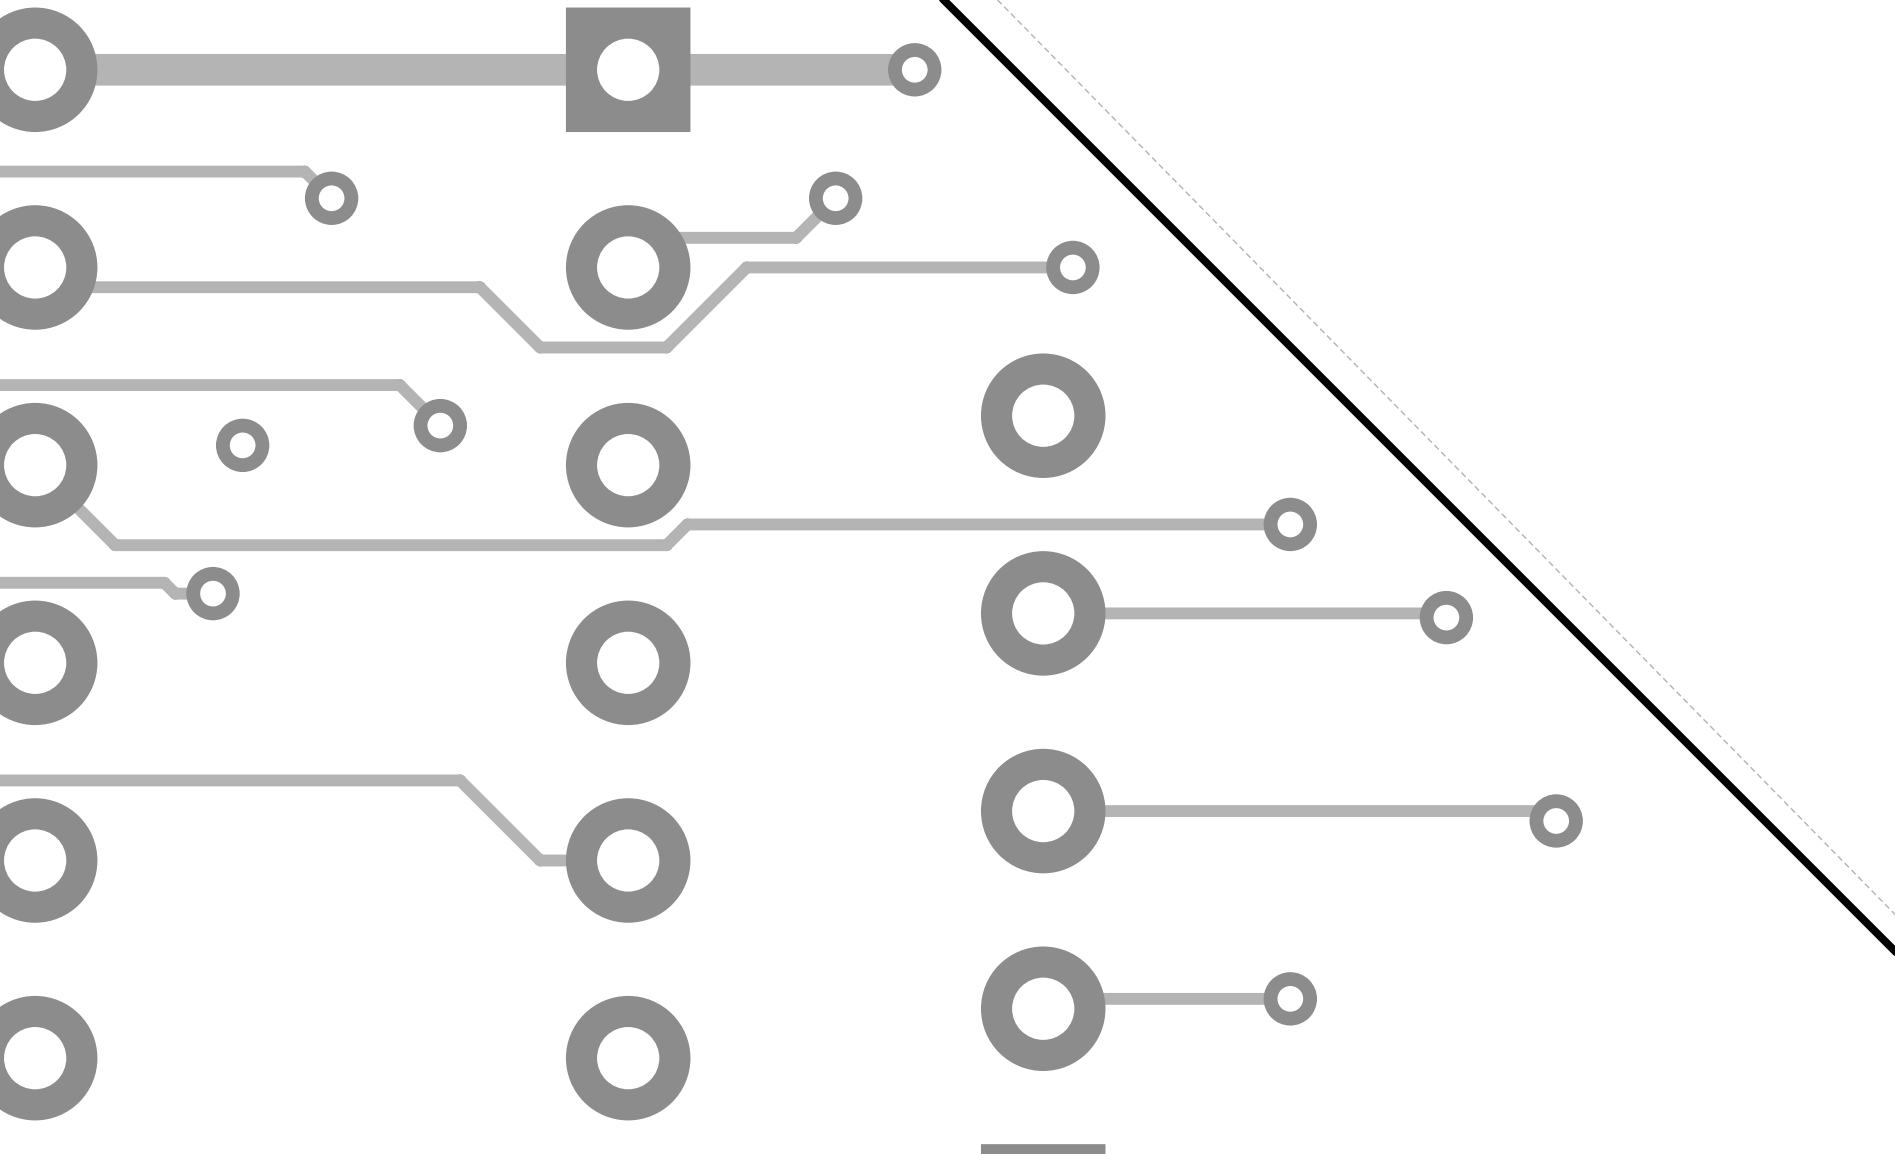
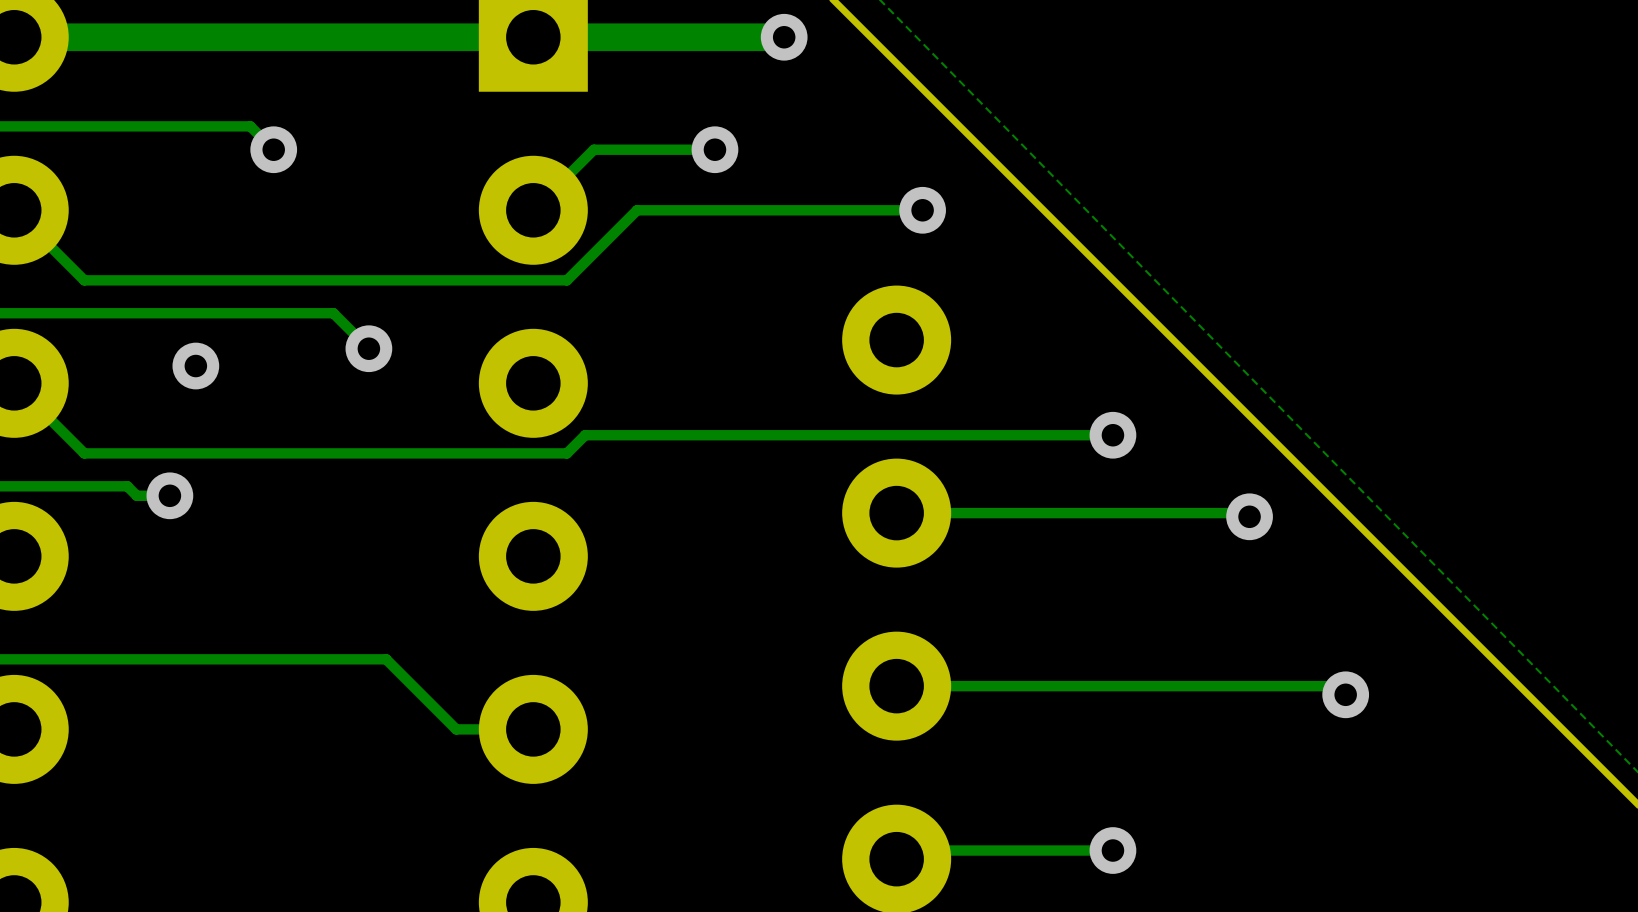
track: (835, 198) (796, 237) (657, 237) -> (714, 149) (593, 149) (533, 210)
track: (54, 287) (479, 287) (540, 347) -> (31, 227) (84, 280) (456, 280)

